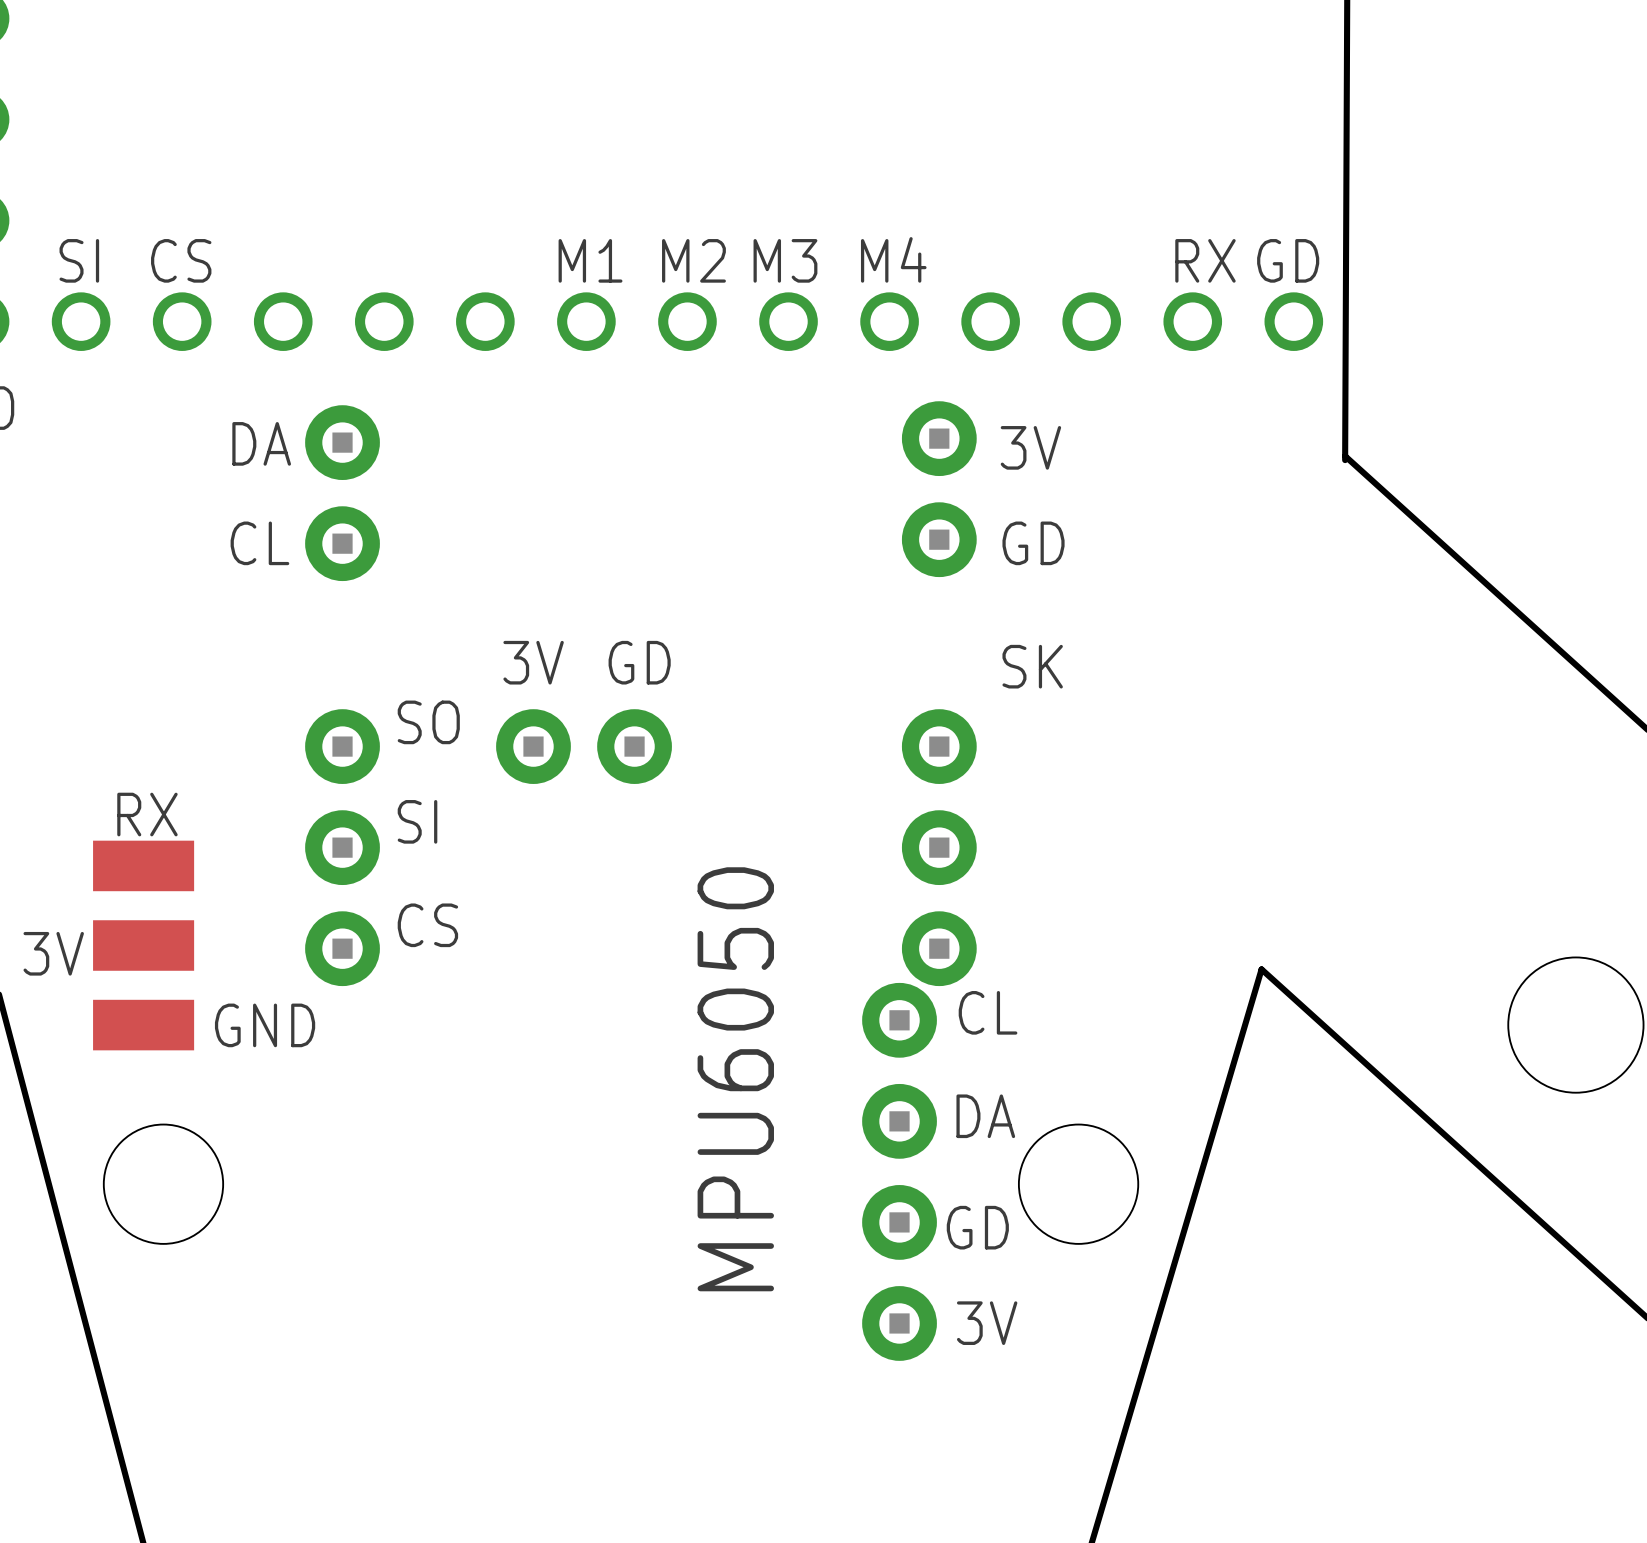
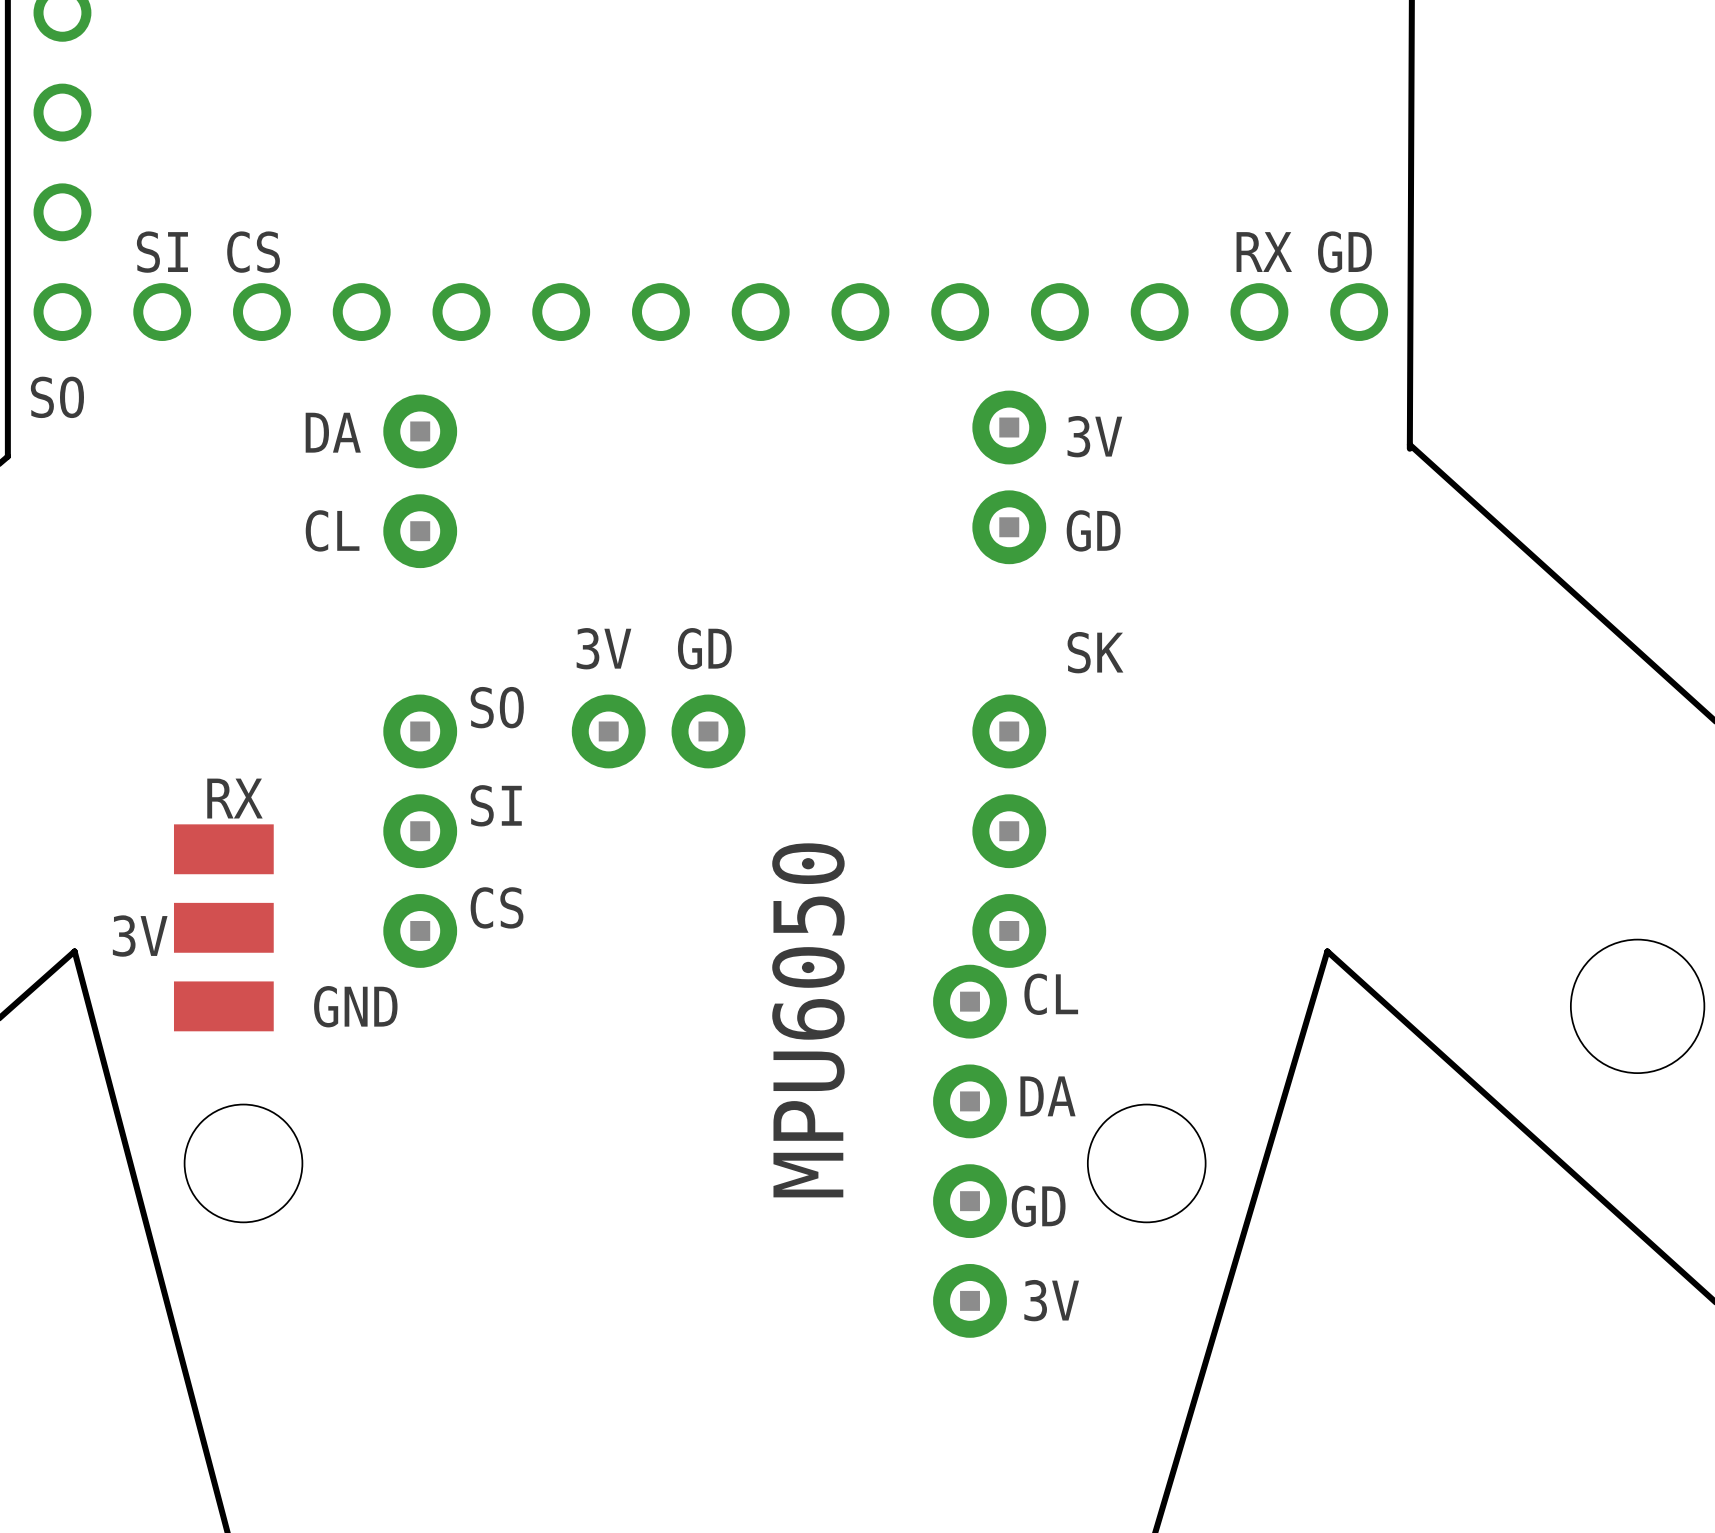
text: M4 (893, 259) -> none
text: M1 (590, 260) -> none
text: M2 (693, 260) -> none
text: M3 (785, 260) -> none

